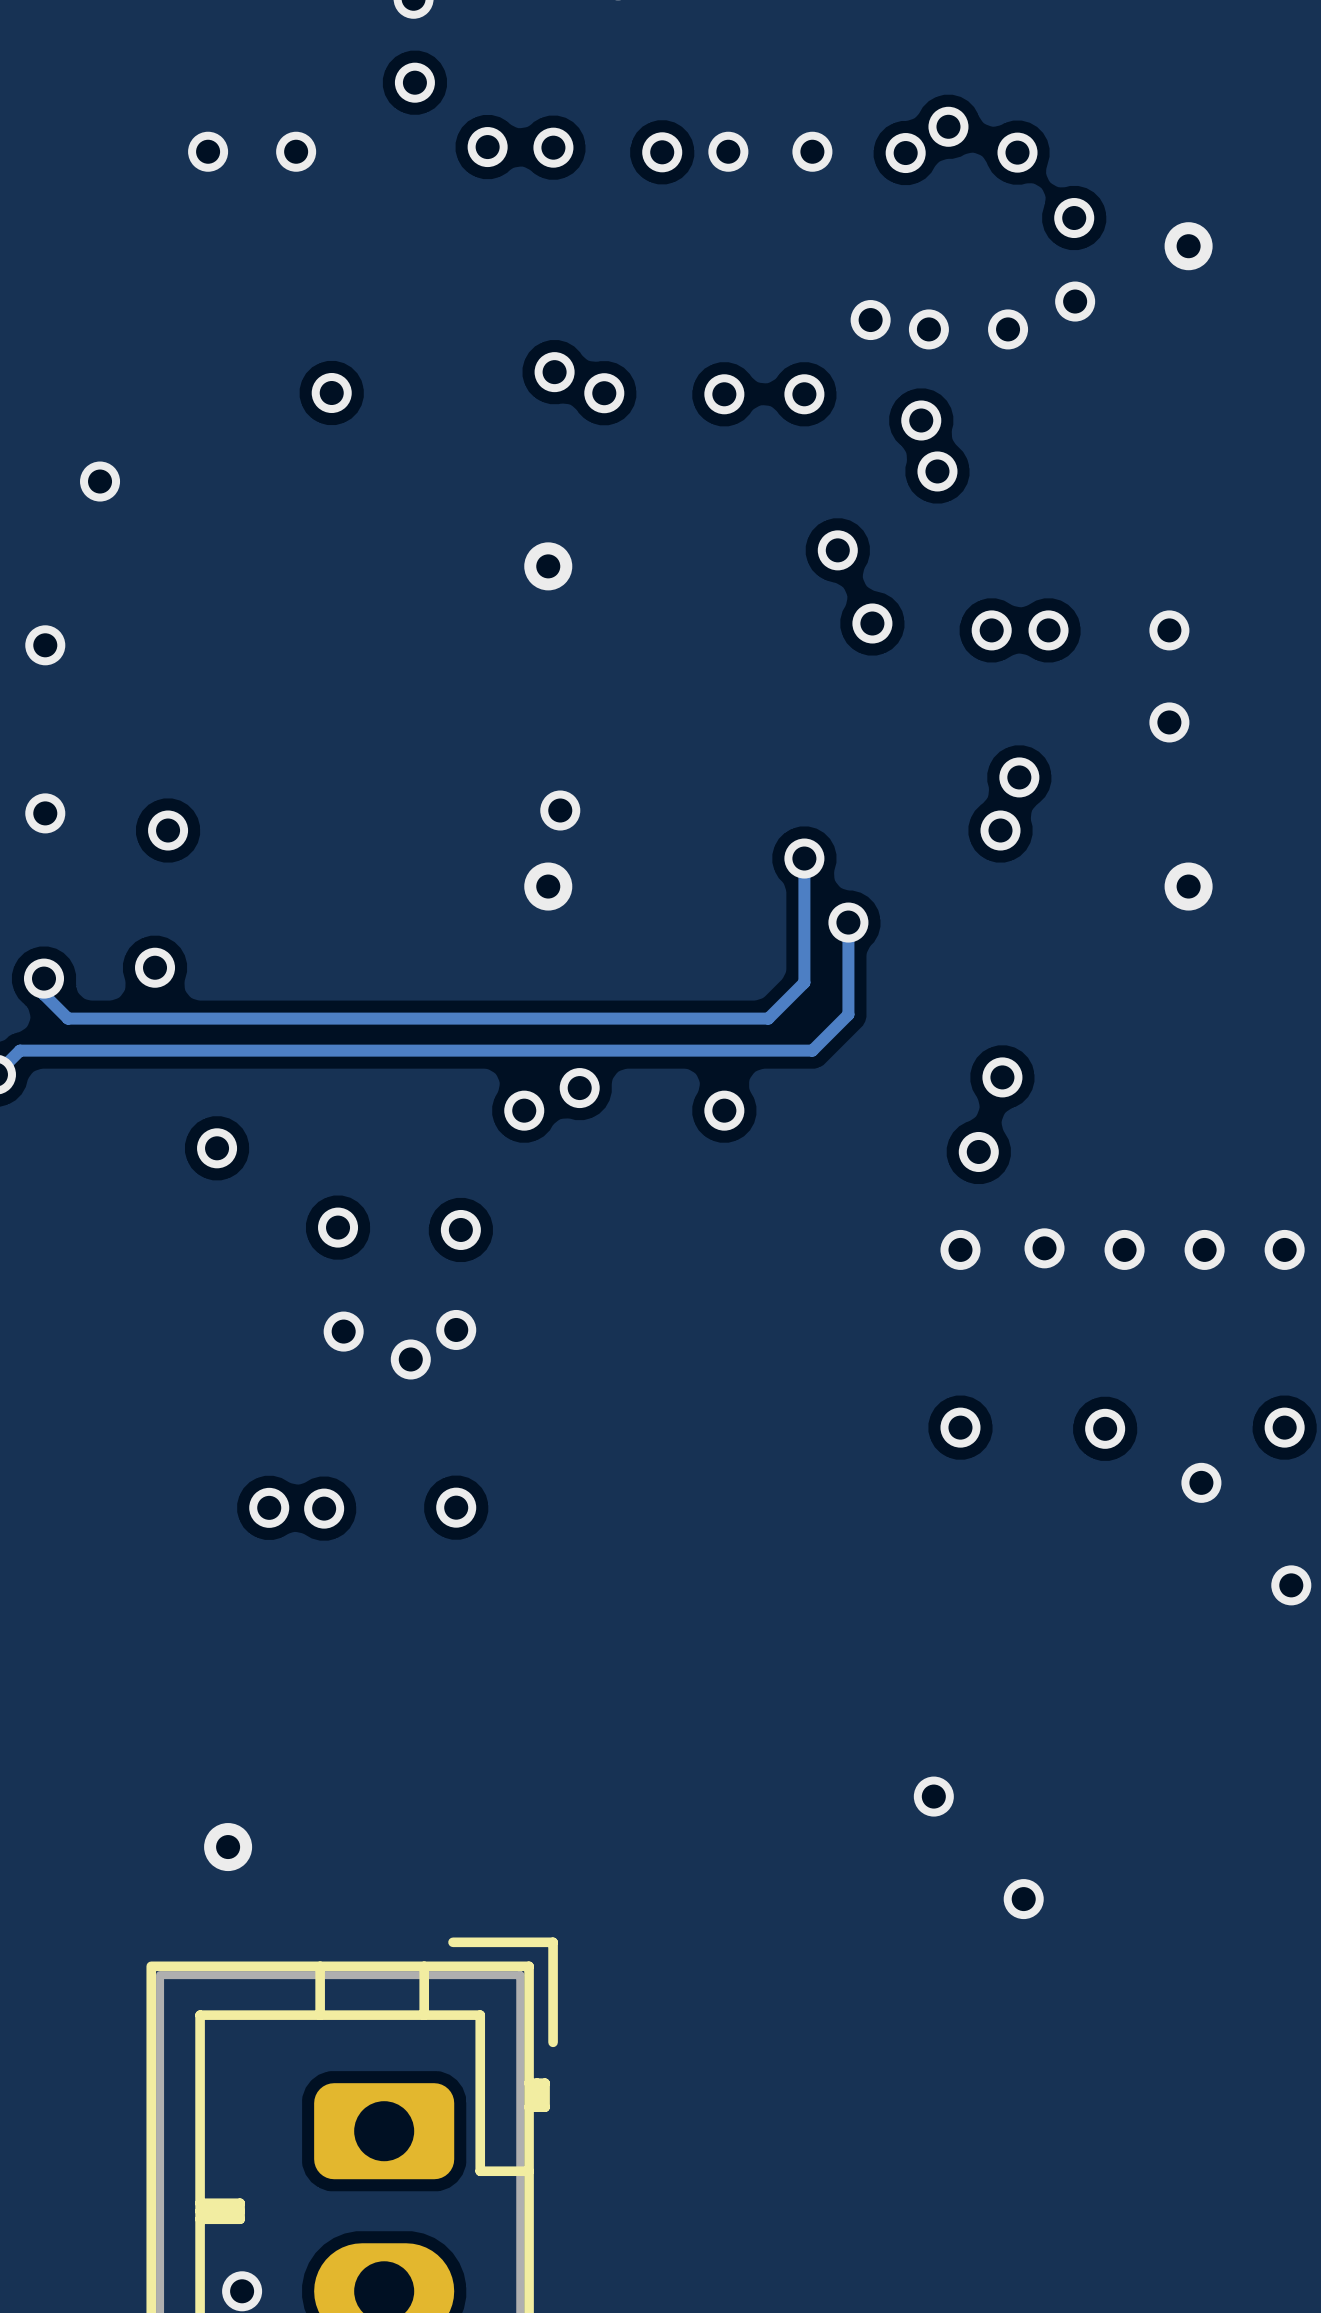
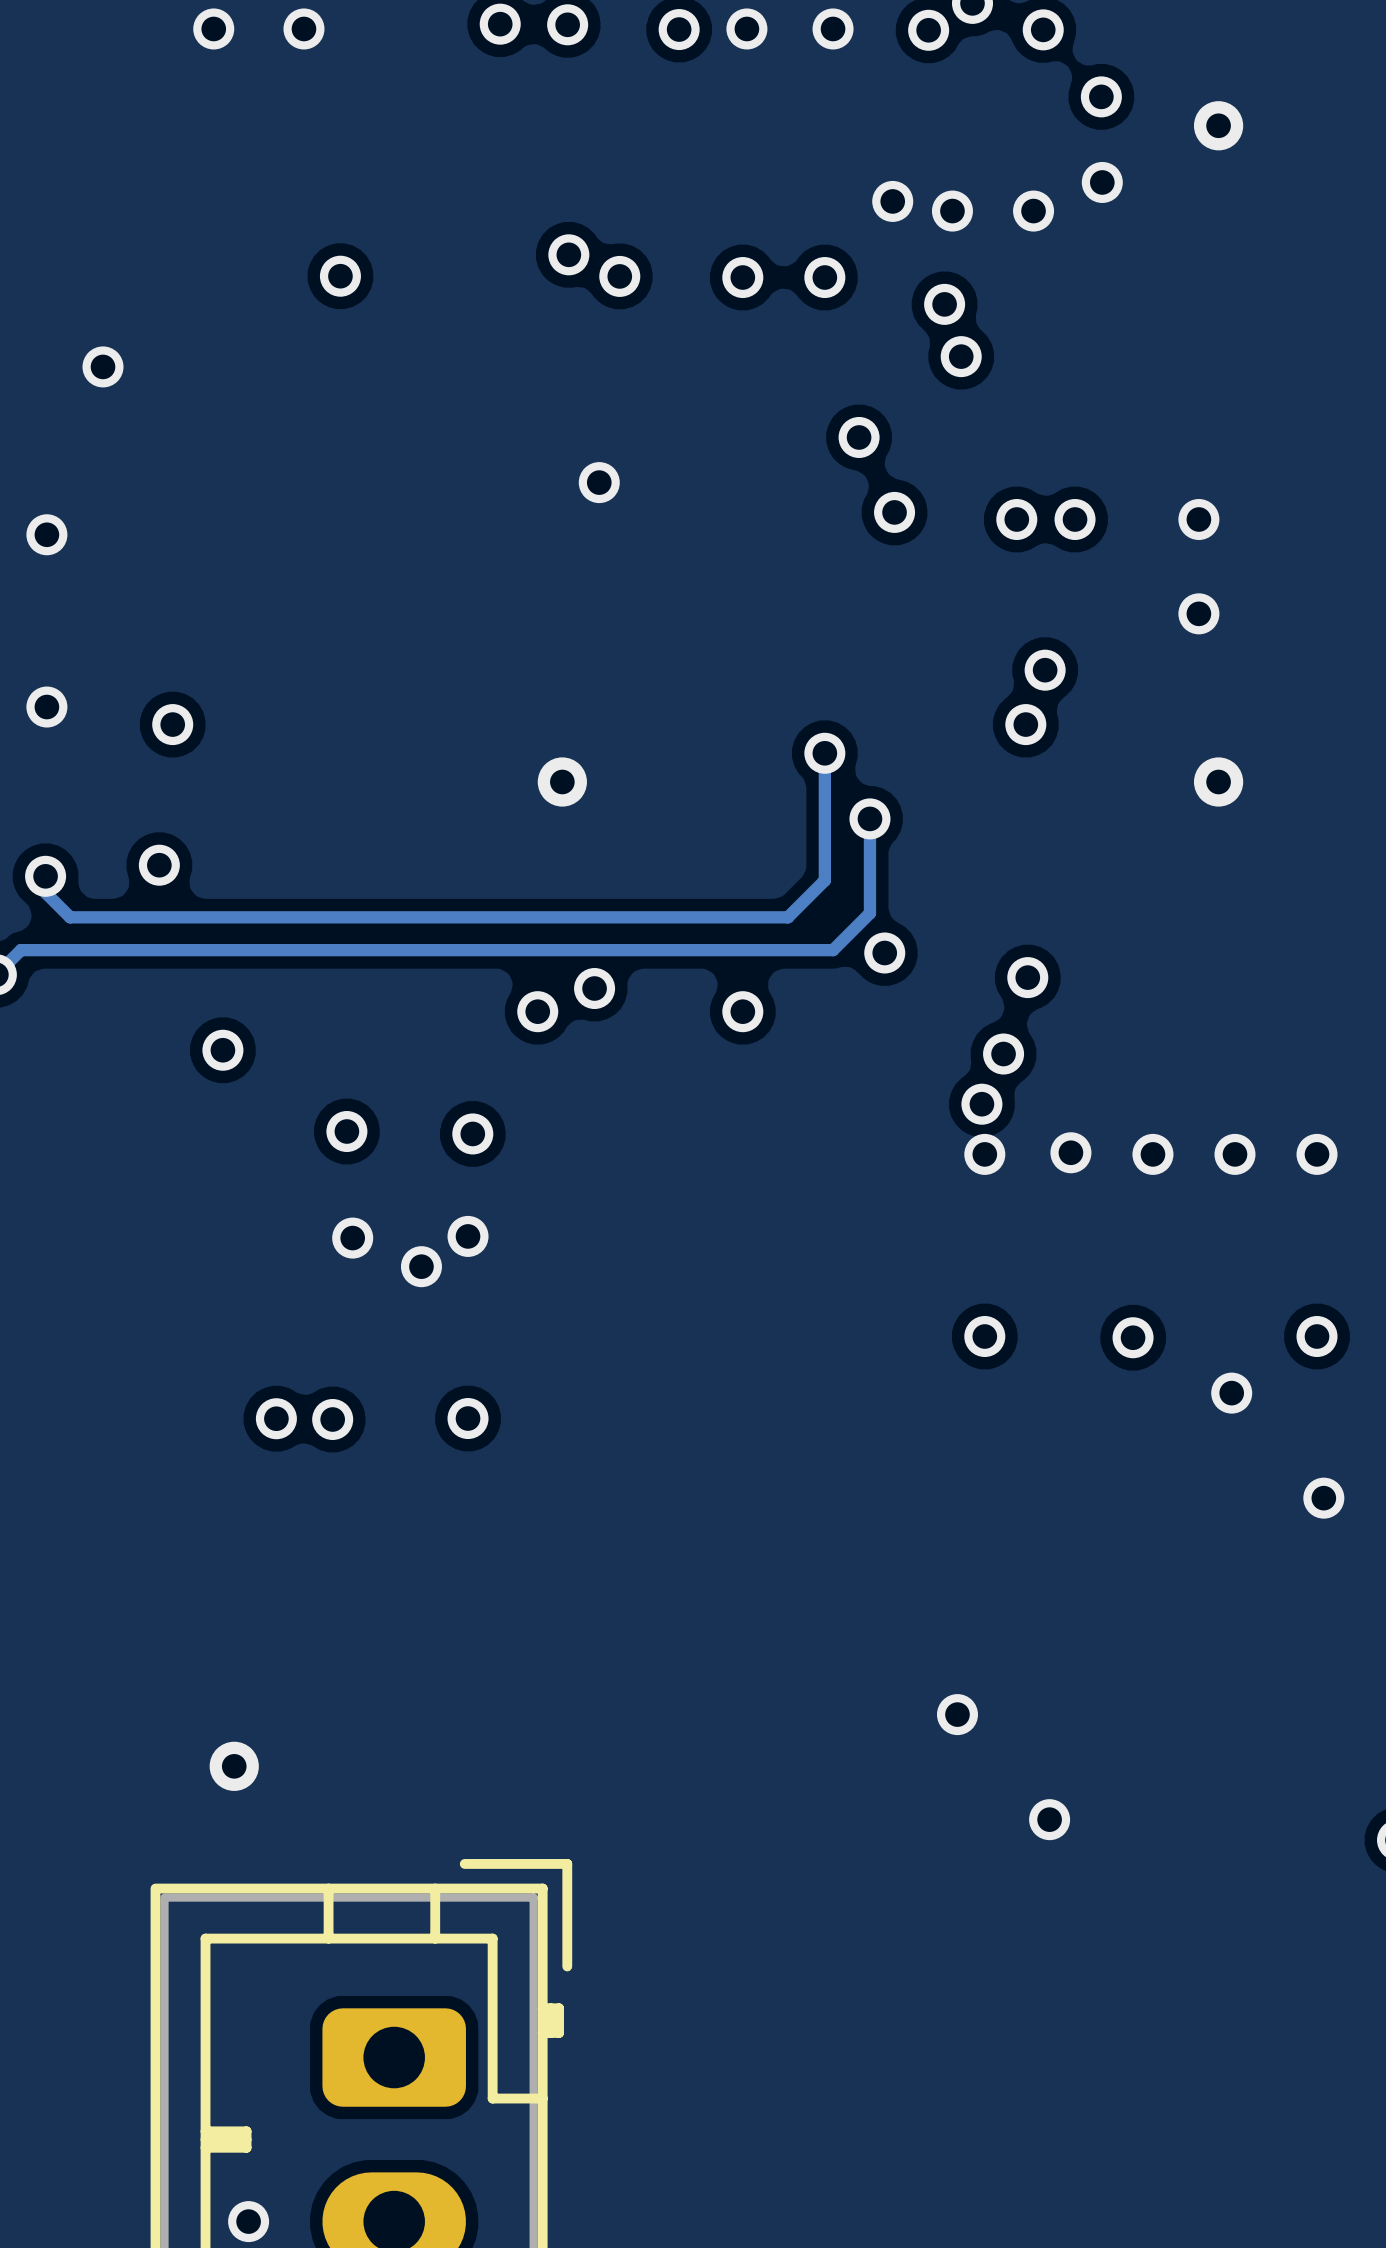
via position: (548, 566) -> (599, 482)
via: (560, 810) -> none
via: none -> (884, 953)
via: none -> (981, 1104)

